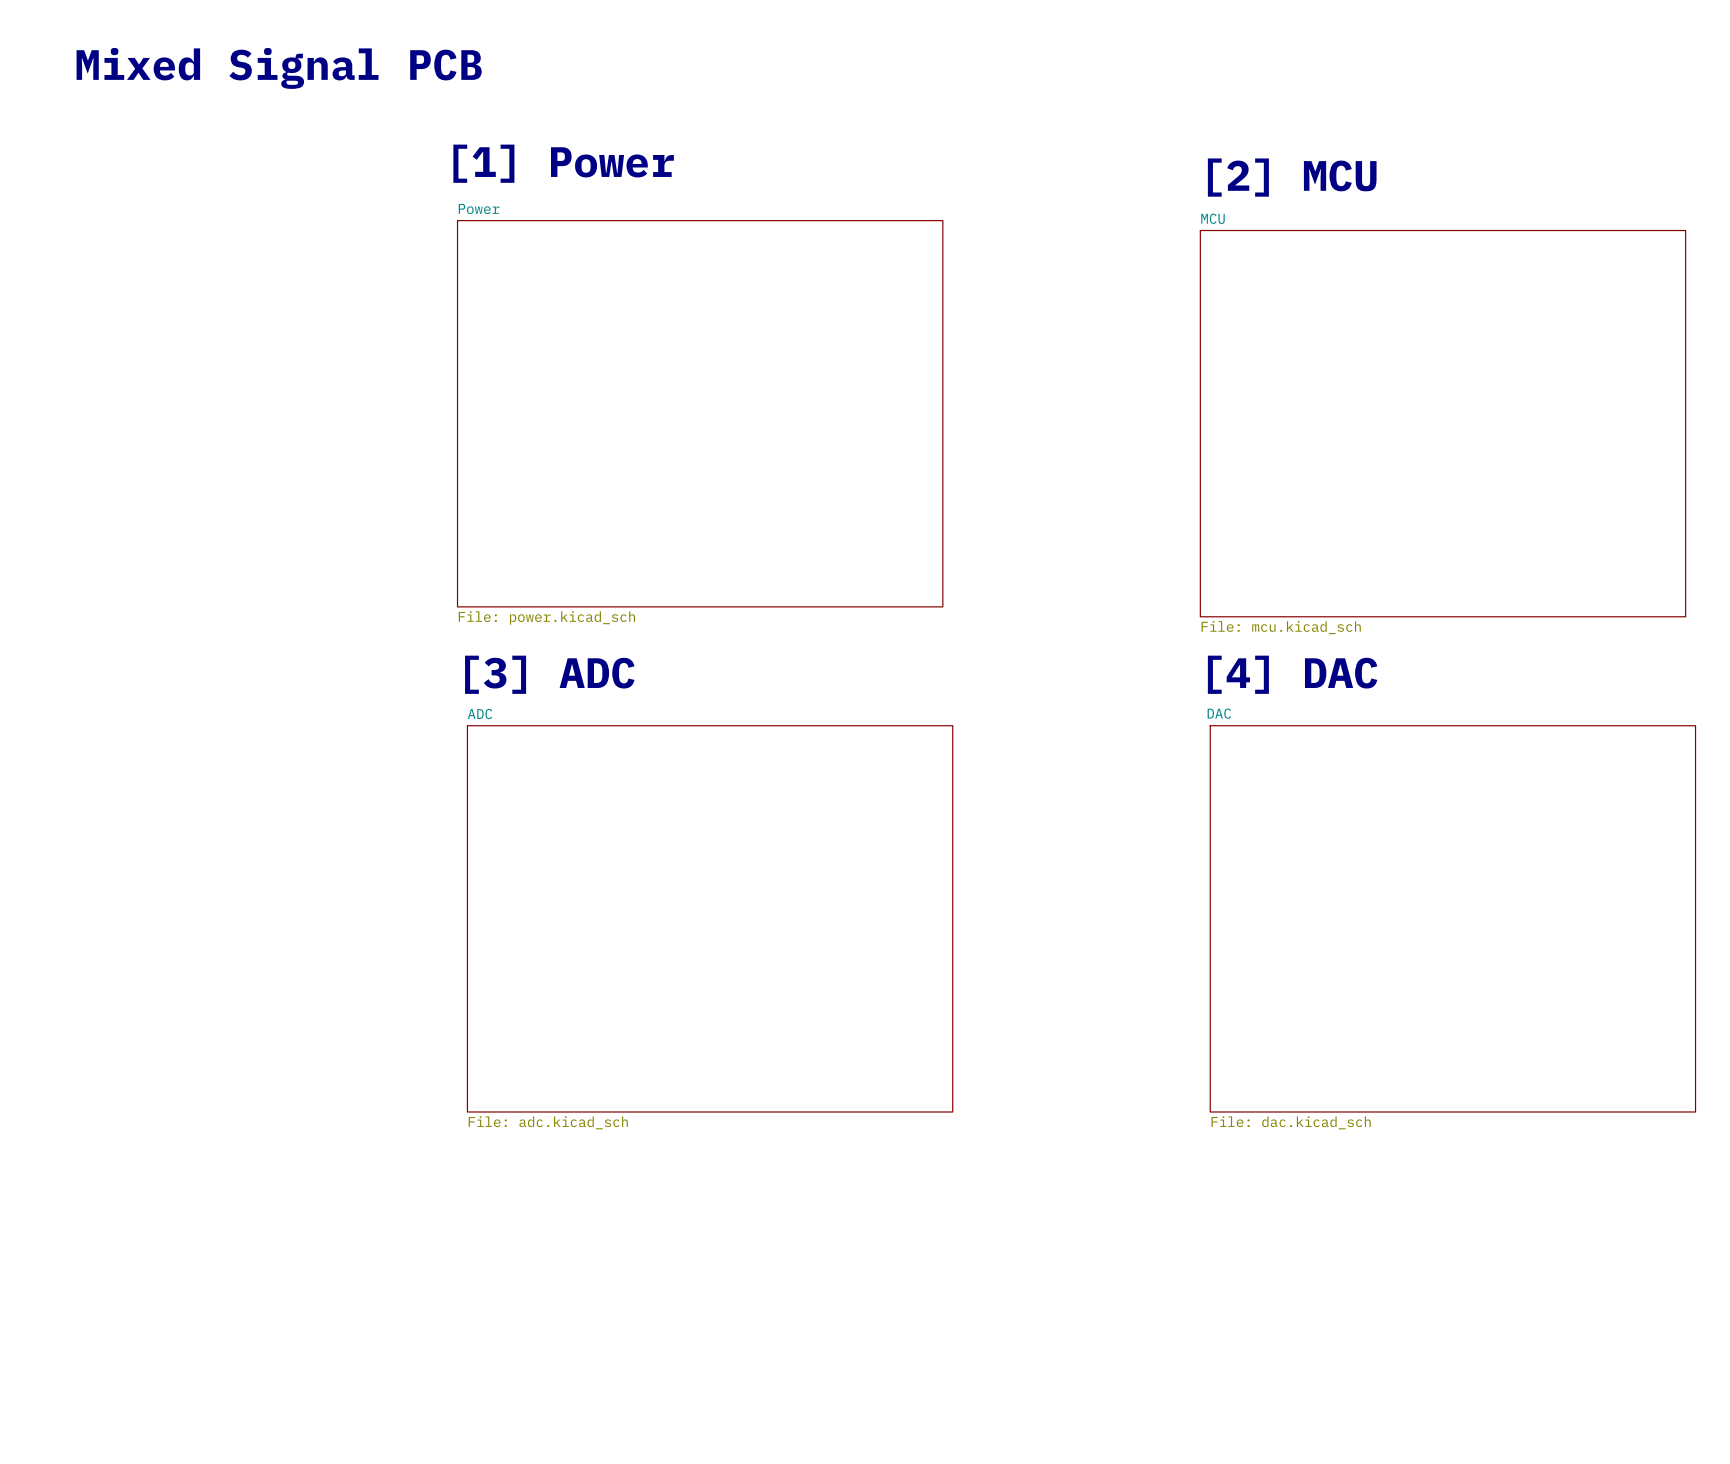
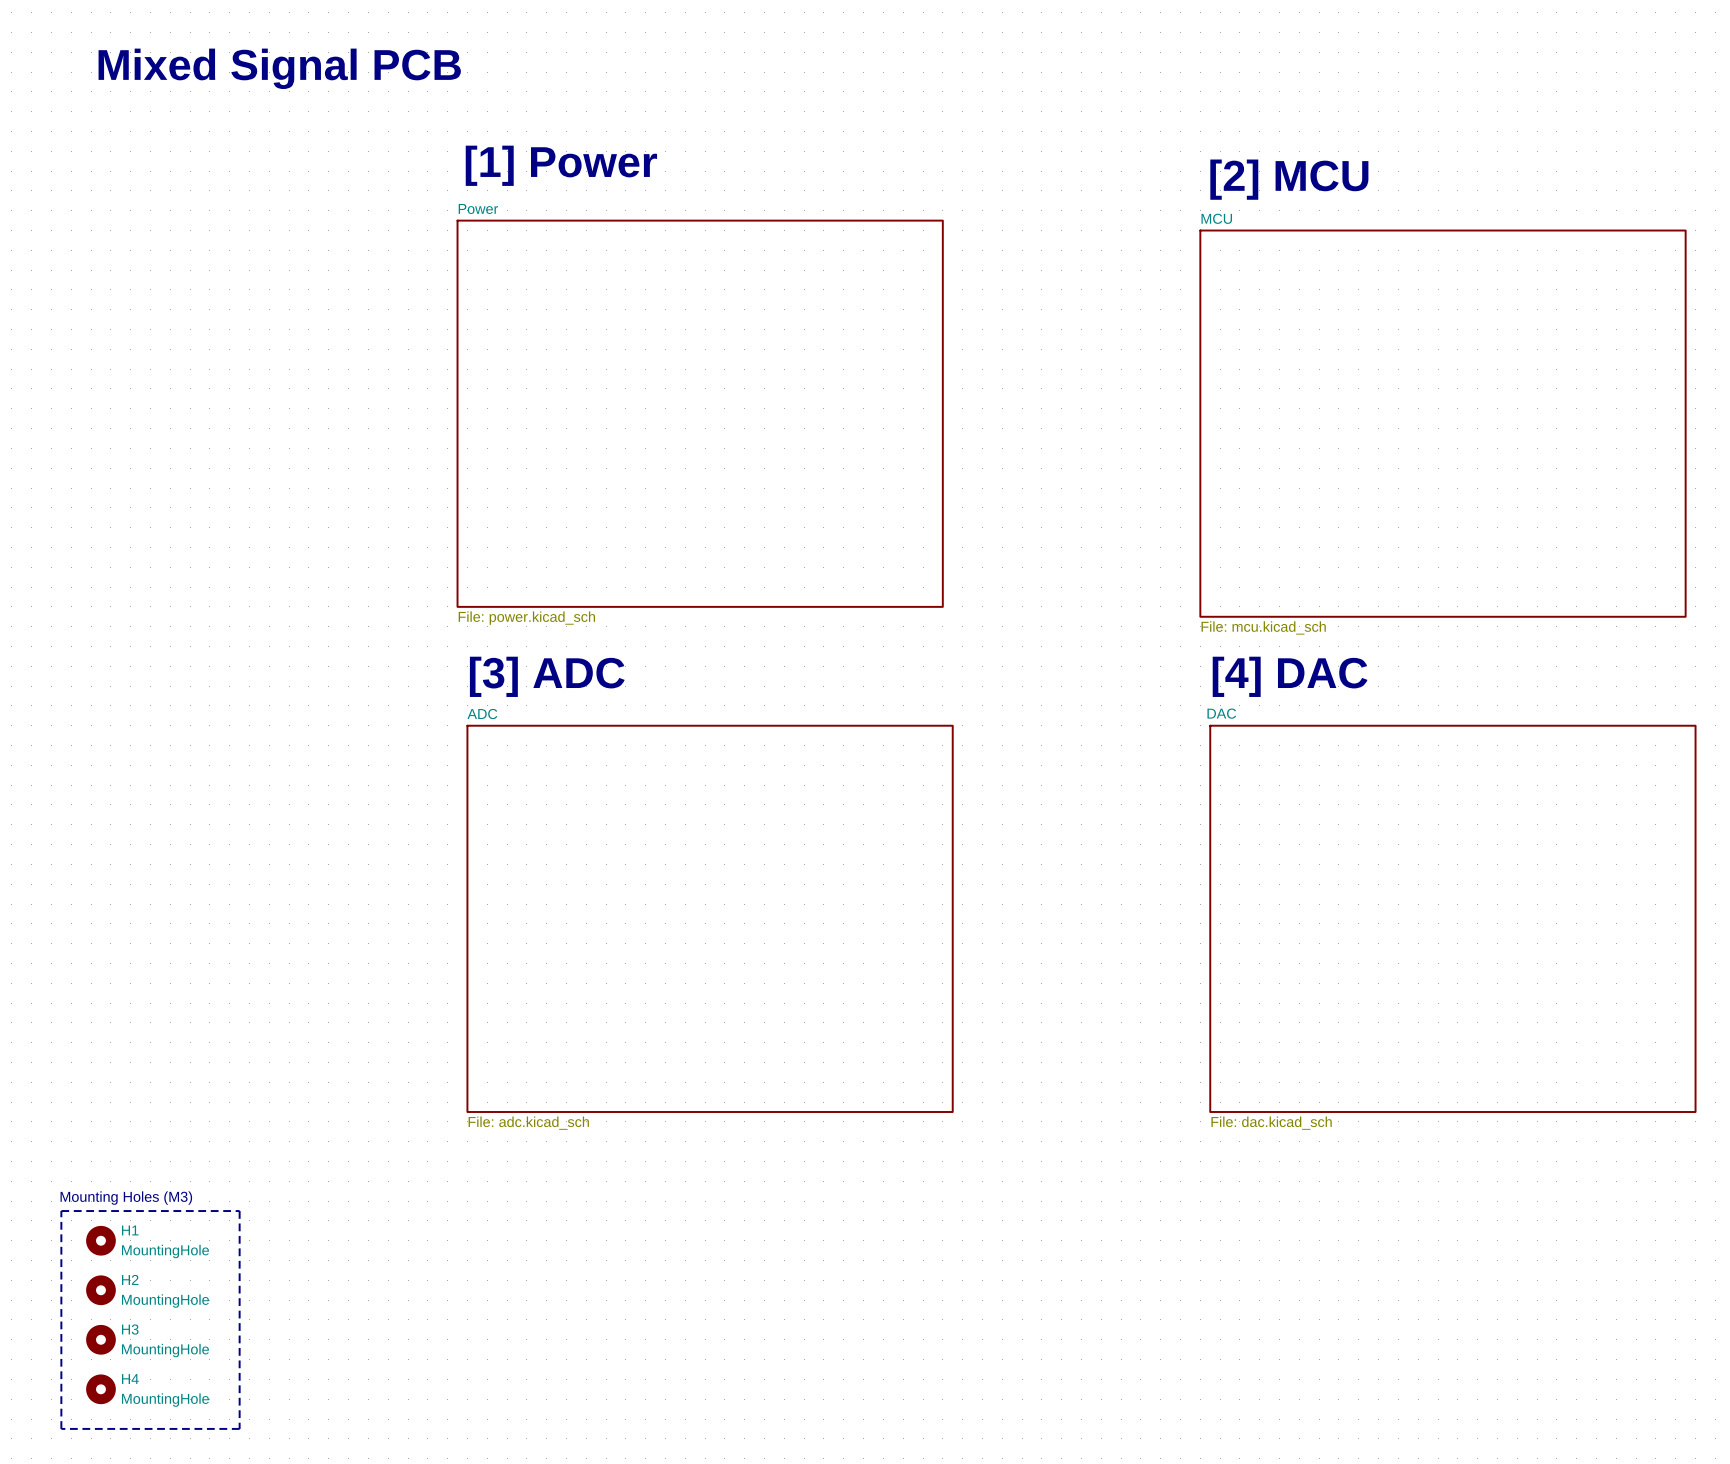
text: none -> Mounting Holes (M3) (126, 1198)
line: none -> (61, 1211) (239, 1211) (239, 1428) (61, 1428) (61, 1211)
H1: none -> MountingHole (100, 1240)
H2: none -> MountingHole (100, 1290)
H3: none -> MountingHole (100, 1339)
H4: none -> MountingHole (100, 1389)

